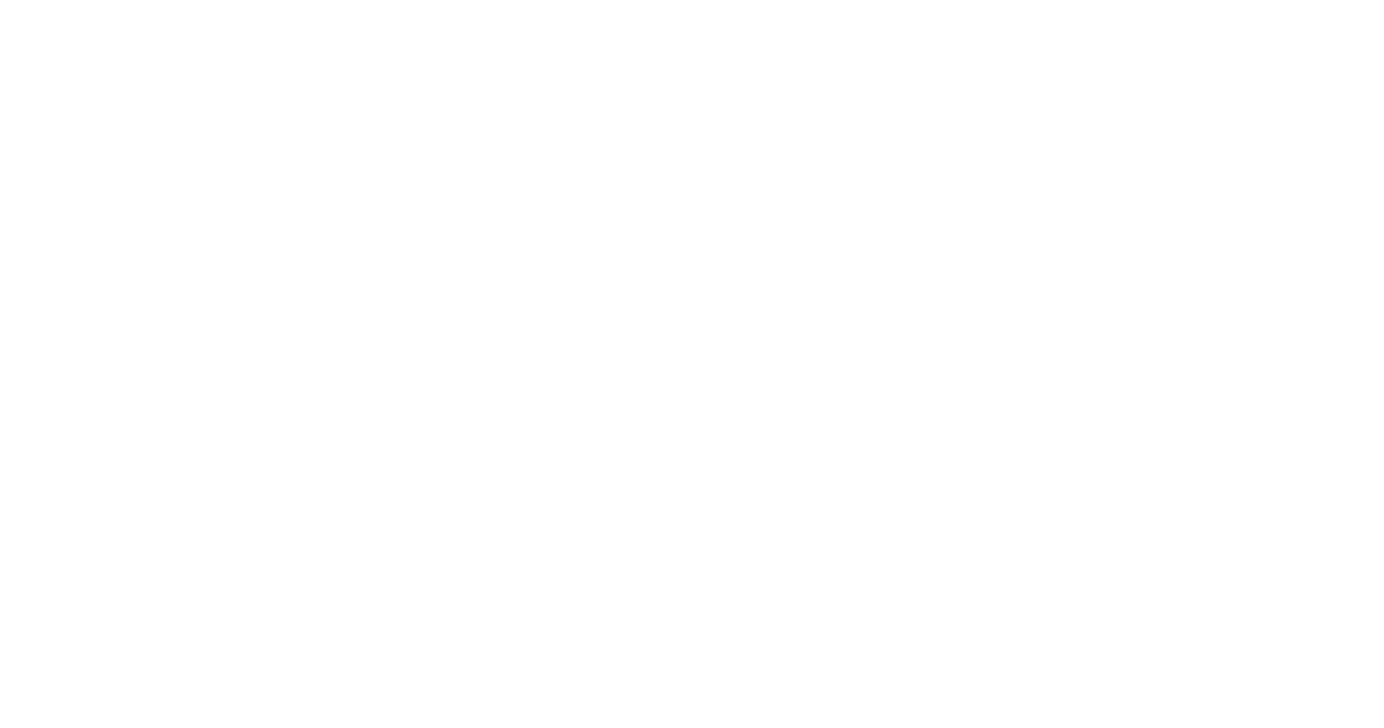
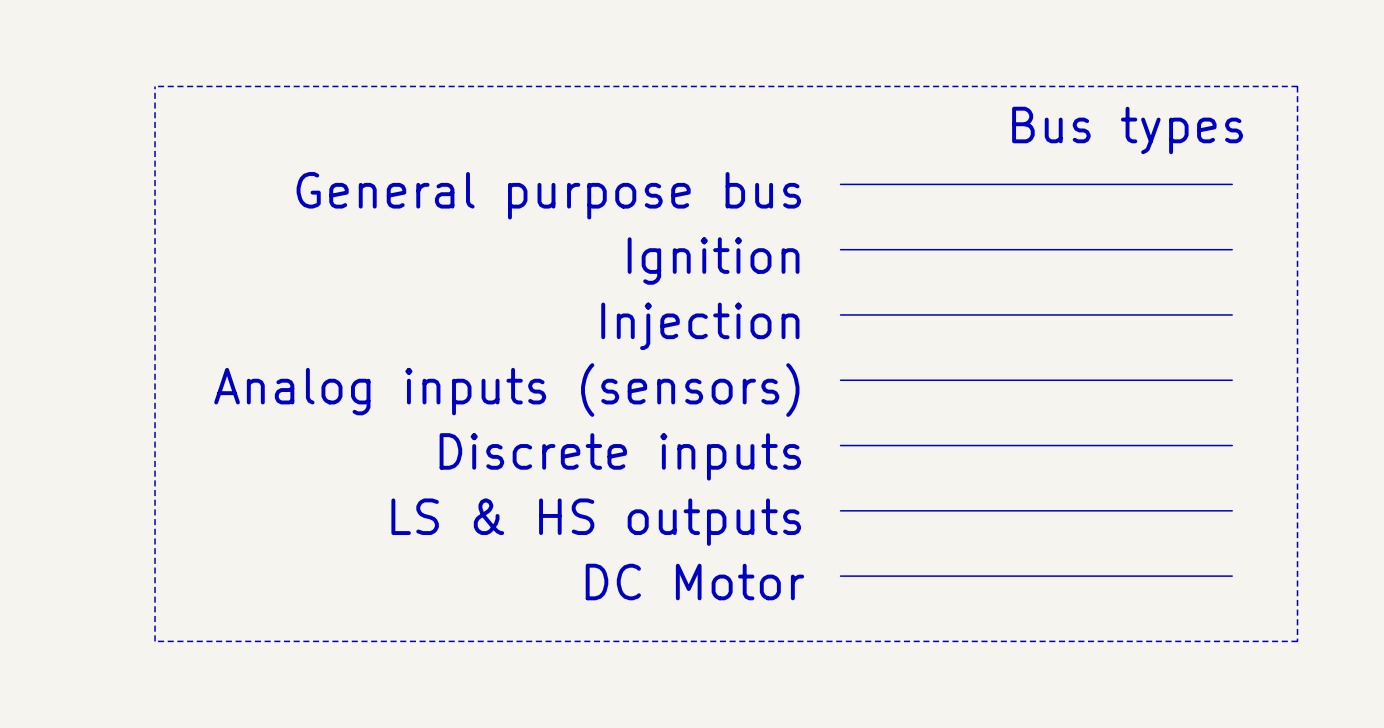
line: none -> (155, 86) (1297, 86) (1297, 641) (155, 641) (155, 86)
text: none -> Bus types (1127, 130)
bus: none -> (840, 184) (1232, 184)
text: none -> General purpose bus (548, 195)
bus: none -> (840, 249) (1232, 249)
text: none -> Ignition (713, 261)
bus: none -> (840, 314) (1232, 314)
text: none -> Injection (700, 326)
bus: none -> (840, 380) (1232, 380)
text: none -> Analog inputs (sensors) (506, 390)
bus: none -> (840, 445) (1232, 445)
text: none -> Discrete inputs (620, 456)
bus: none -> (840, 510) (1232, 510)
text: none -> LS & HS outputs (596, 522)
bus: none -> (840, 576) (1232, 576)
text: none -> DC Motor (694, 582)

